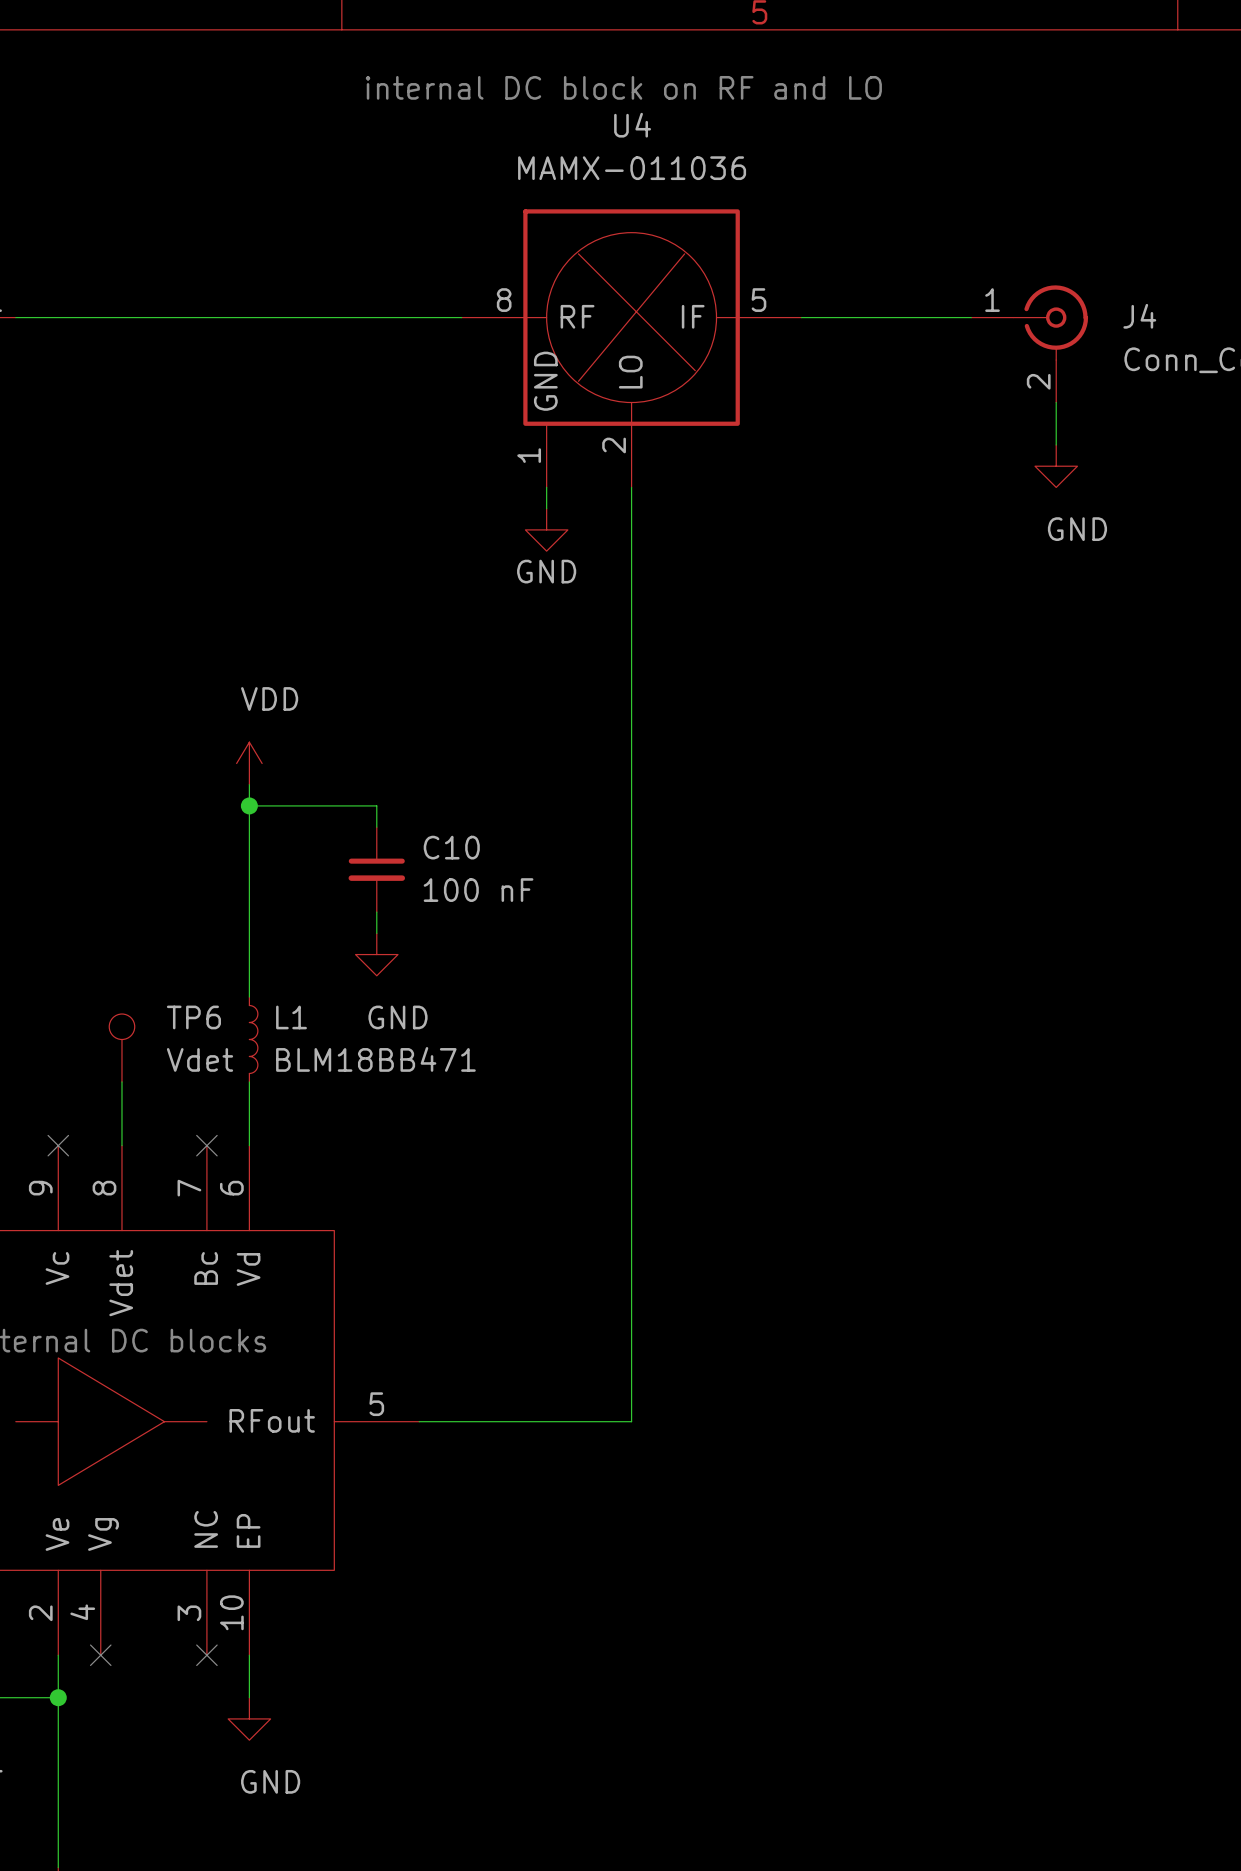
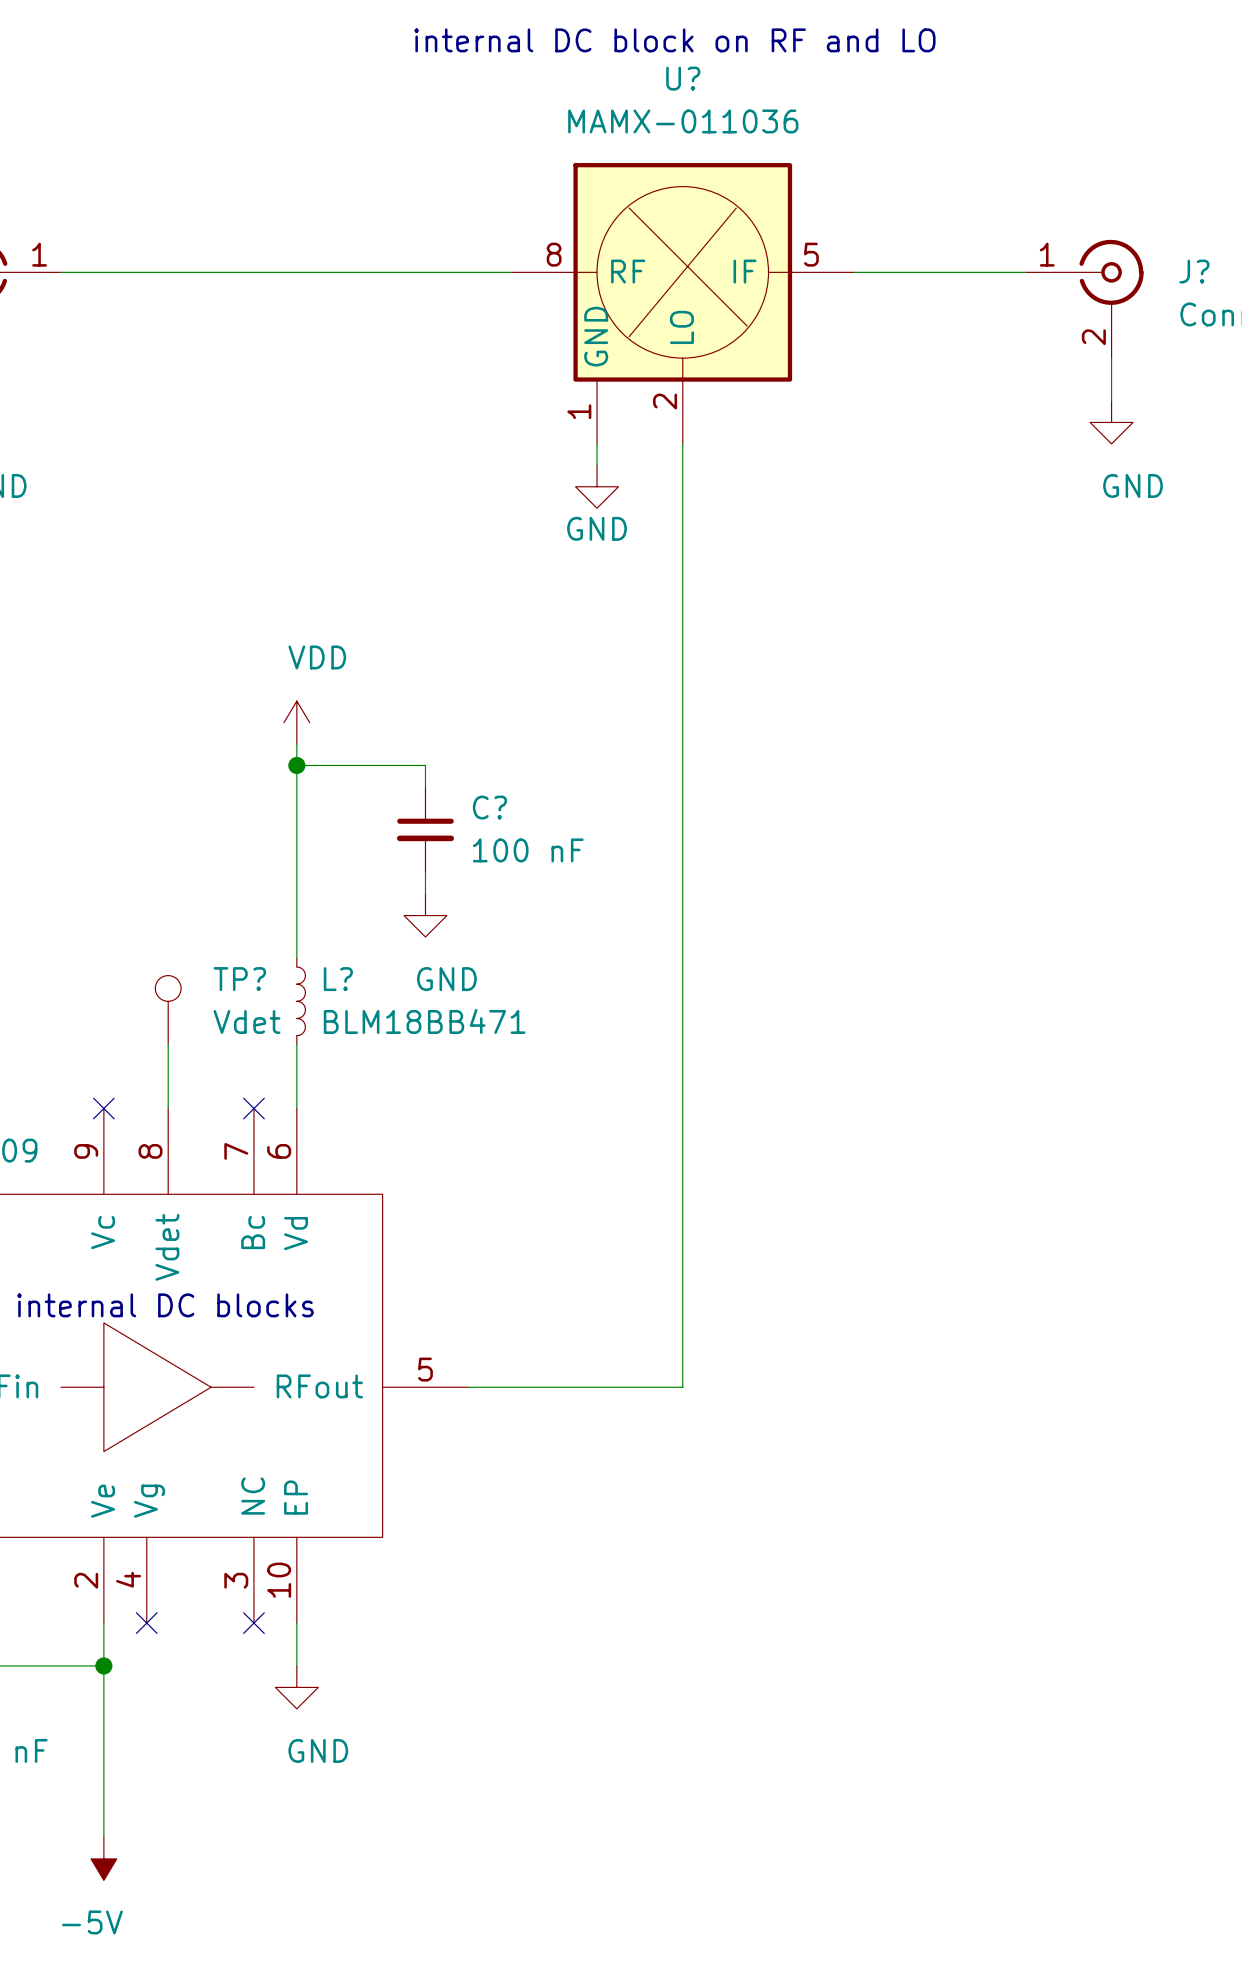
U4 name: U4 (632, 125) -> U? (683, 78)
J4 name: J4 (1139, 316) -> J? (1194, 271)
C10 name: C10 (451, 847) -> C? (489, 807)
TP6 name: TP6 (193, 1017) -> TP? (239, 979)
L1 name: L1 (291, 1017) -> L? (338, 979)

